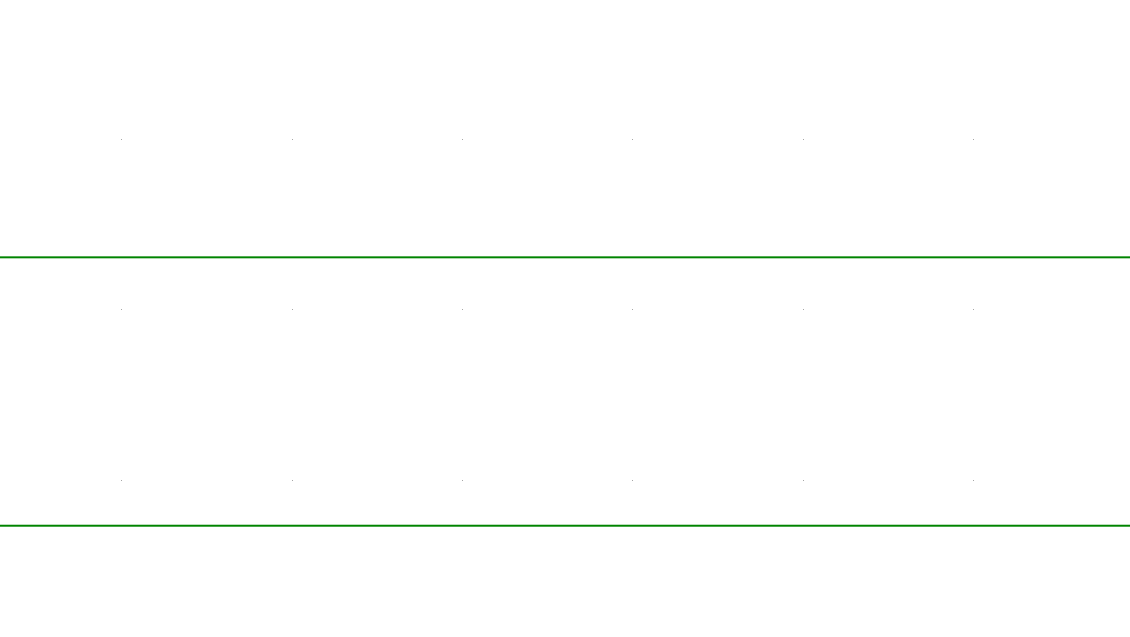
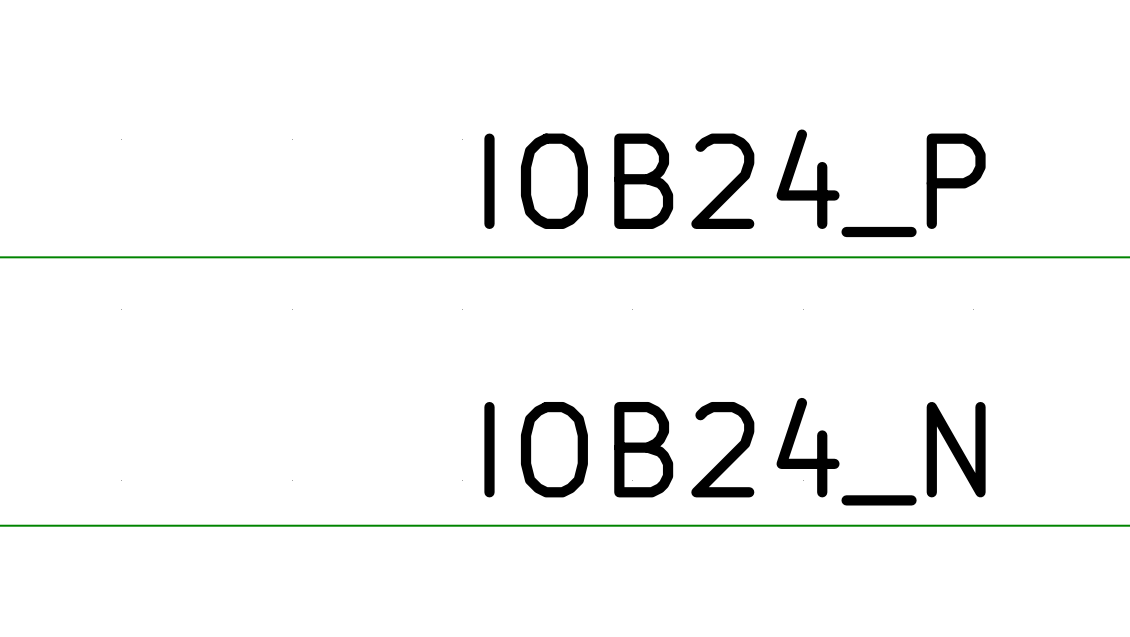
label: none -> IOB24_P (735, 183)
label: none -> IOB24_N (735, 451)

